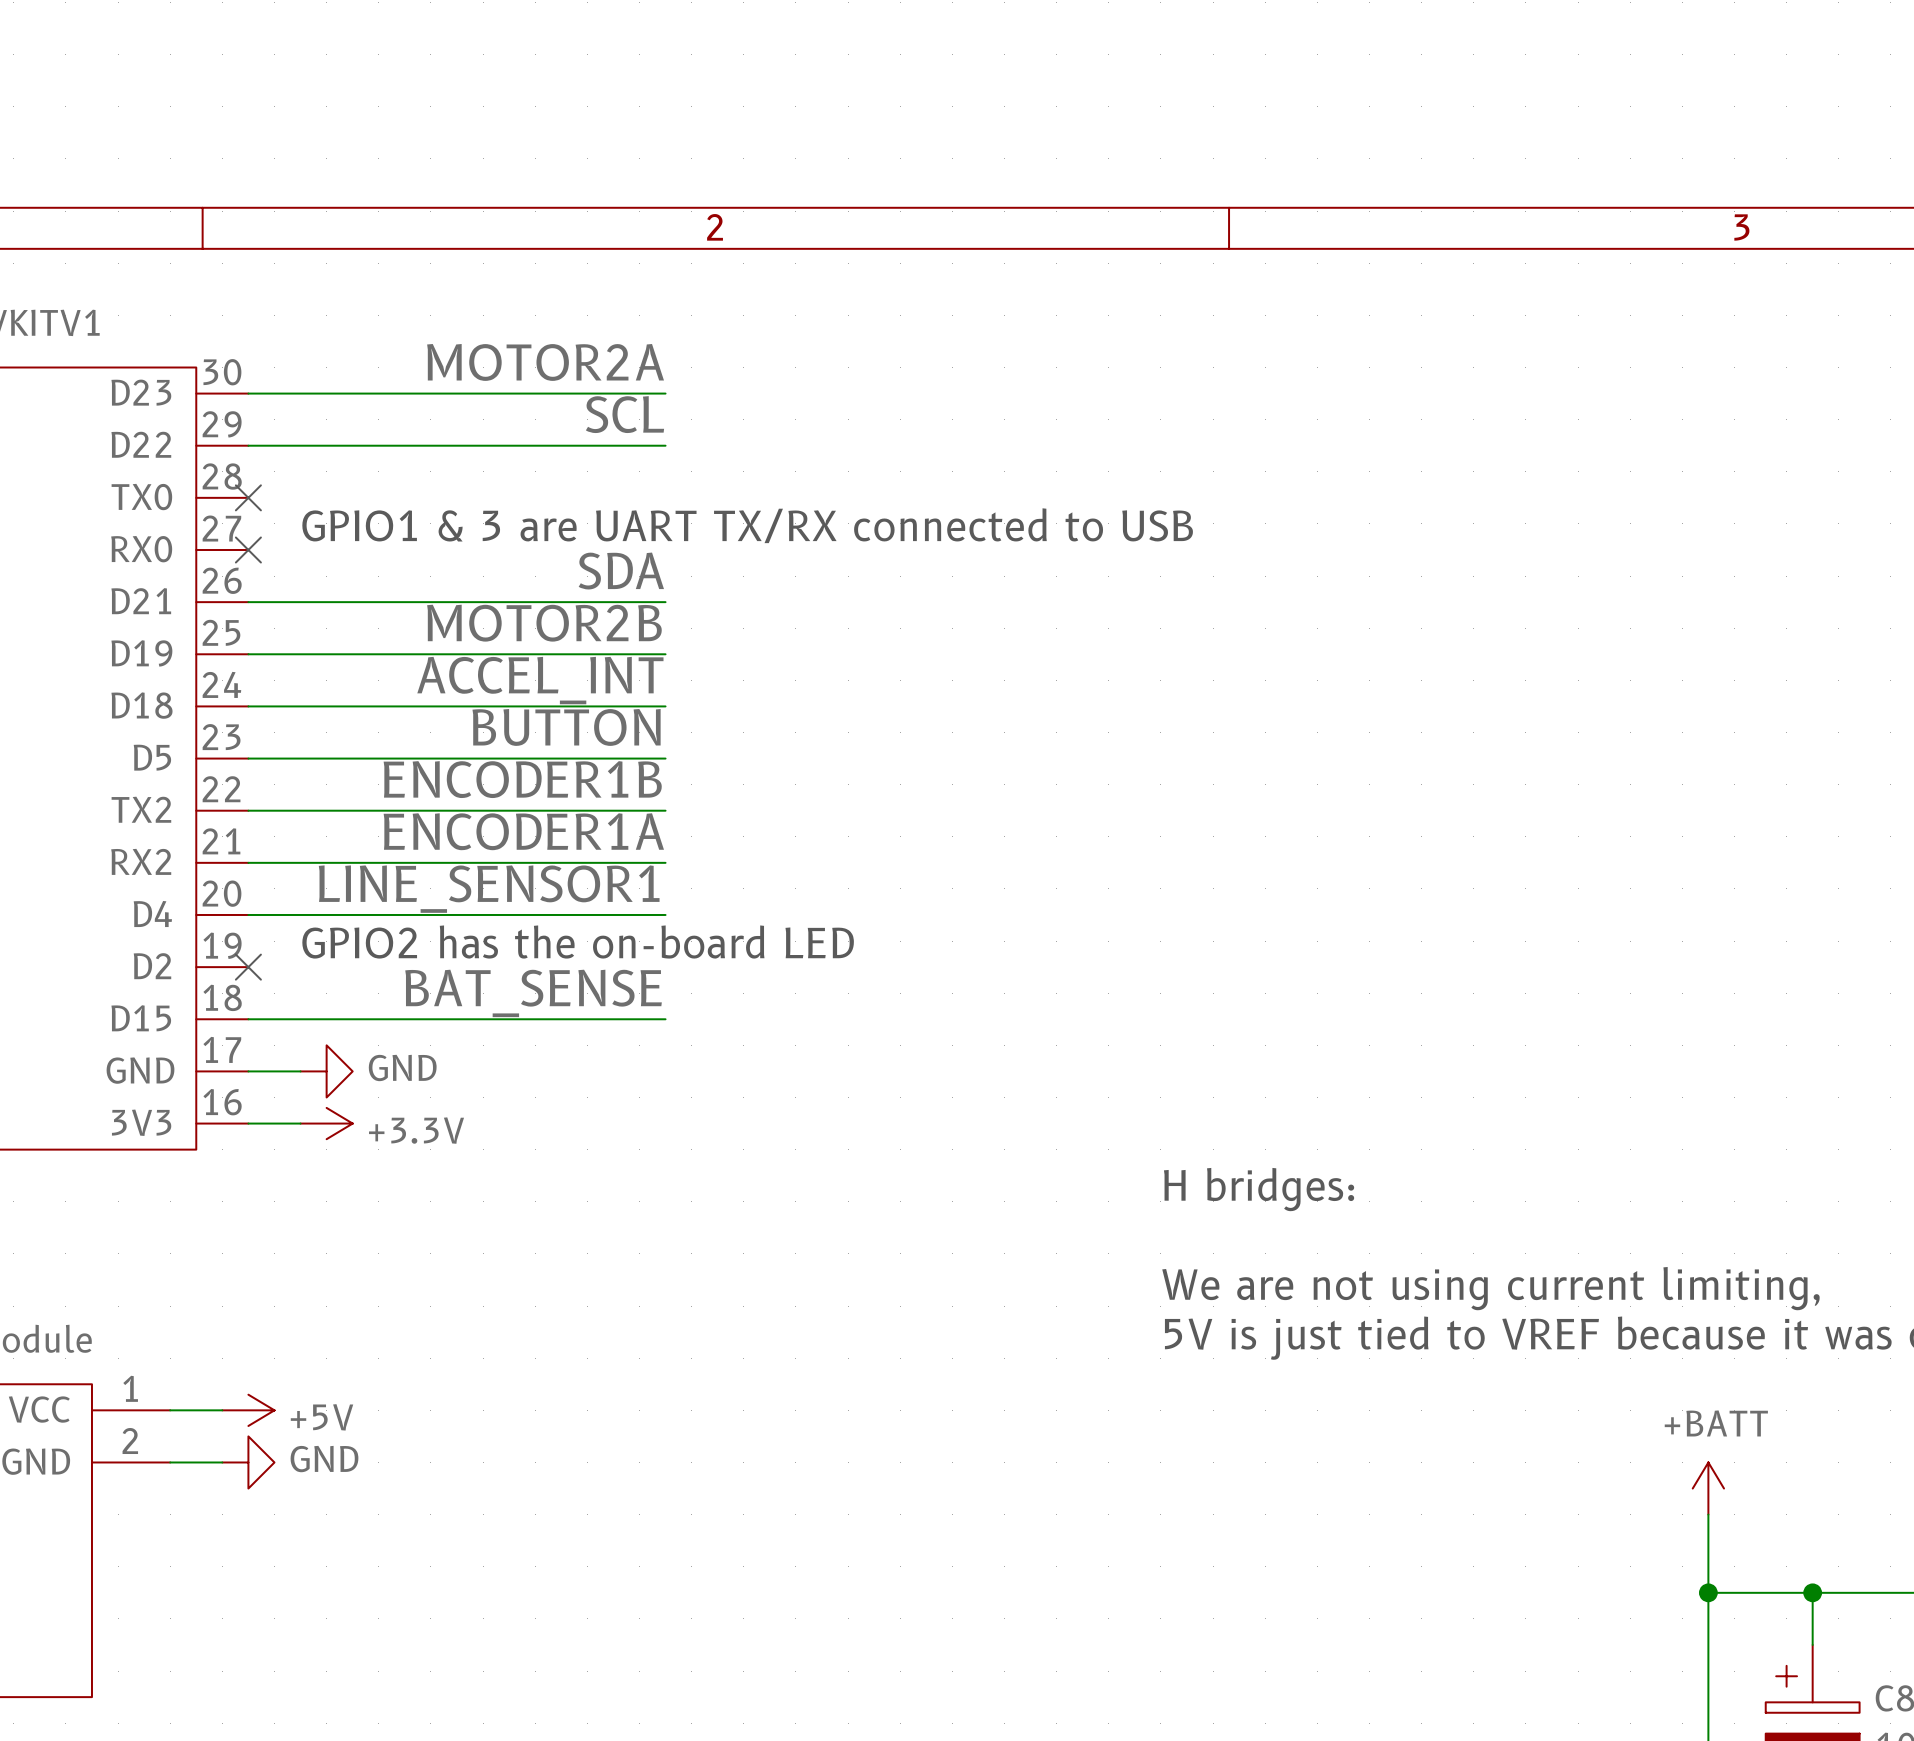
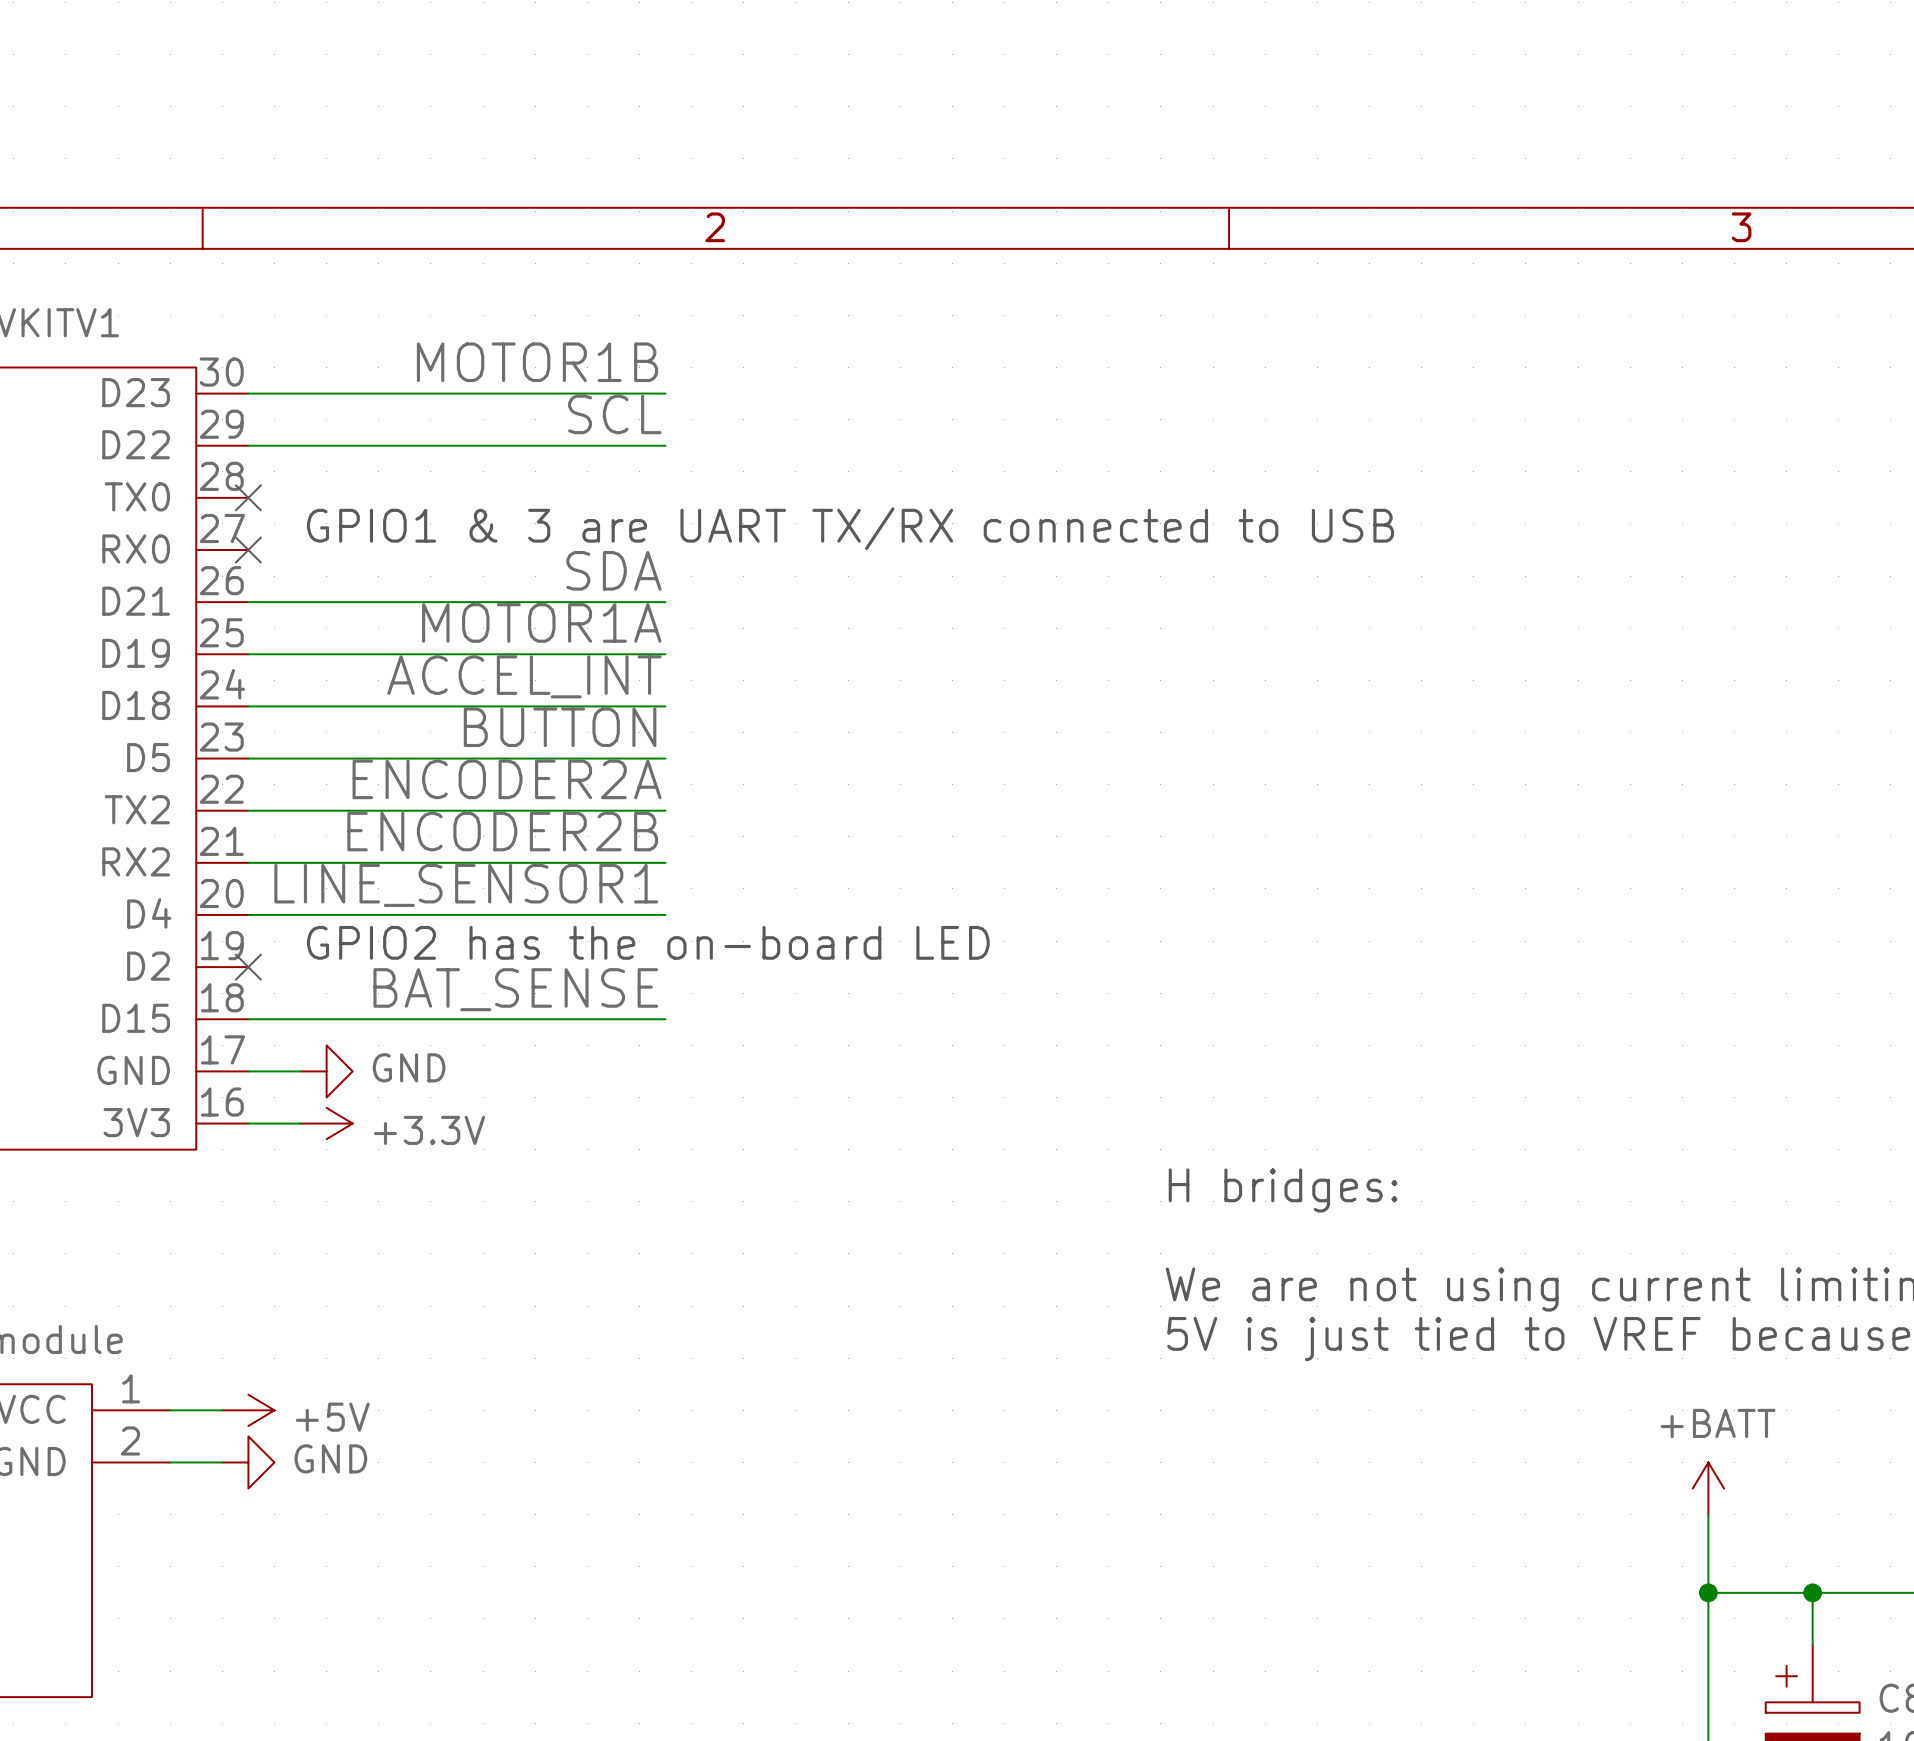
label: MOTOR2A (545, 362) -> MOTOR1B (537, 362)
label: MOTOR2B (544, 623) -> MOTOR1A (541, 622)
label: ENCODER1B (522, 779) -> ENCODER2A (507, 779)
label: ENCODER1A (523, 831) -> ENCODER2B (502, 831)

